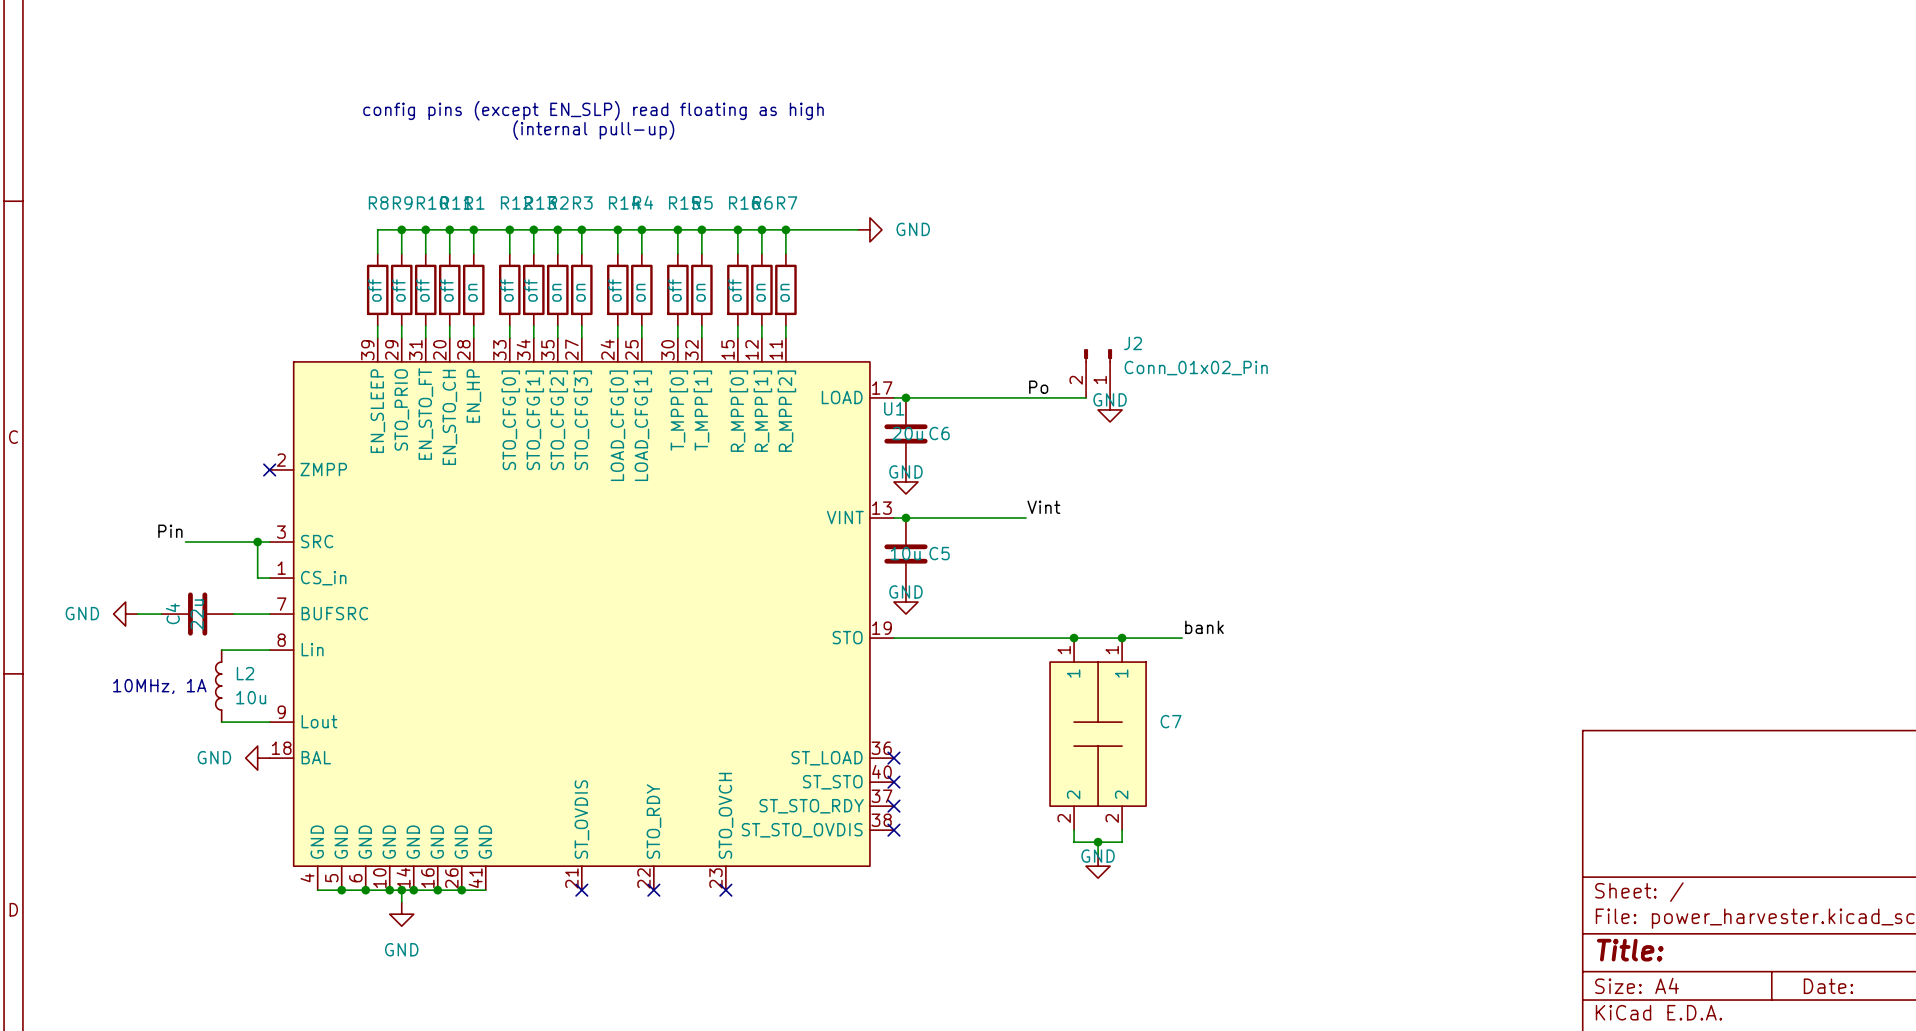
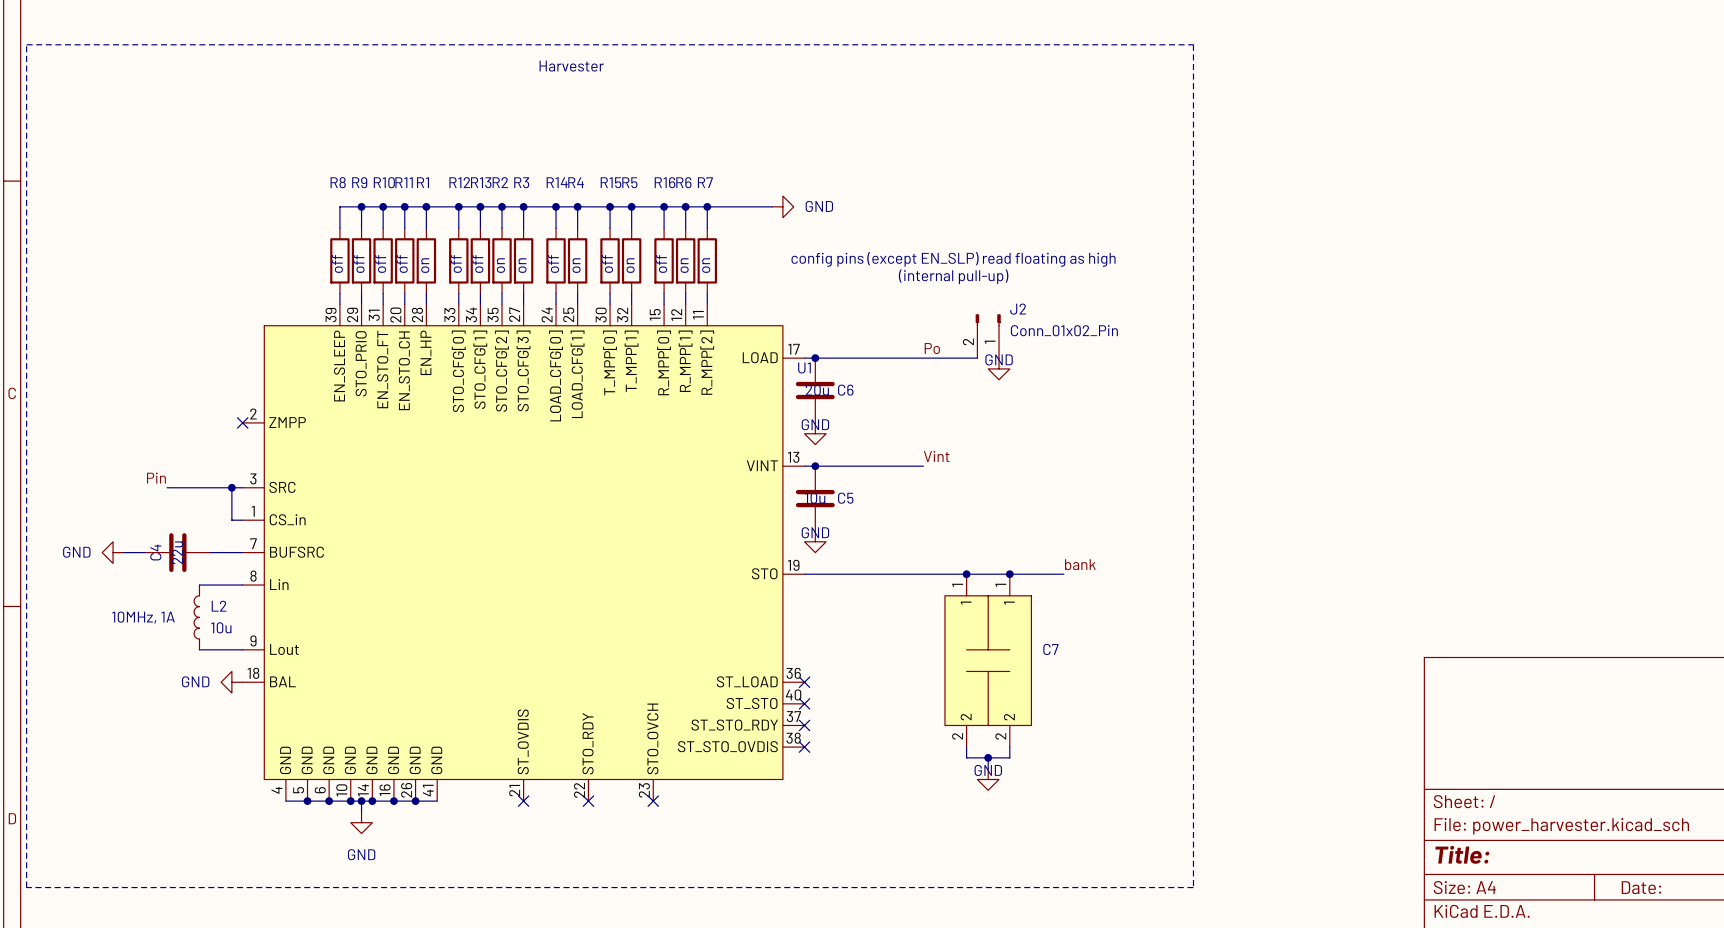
line: none -> (26, 44) (1193, 44) (1193, 887) (26, 887) (26, 44)
text: none -> Harvester (571, 66)
text: config pins (except EN_SLP) read floating as high (593, 110) -> none
text: (internal pull-up) (593, 130) -> none
text: none -> config pins (except EN_SLP) read floating as high (953, 259)
text: none -> (internal pull-up) (953, 276)

